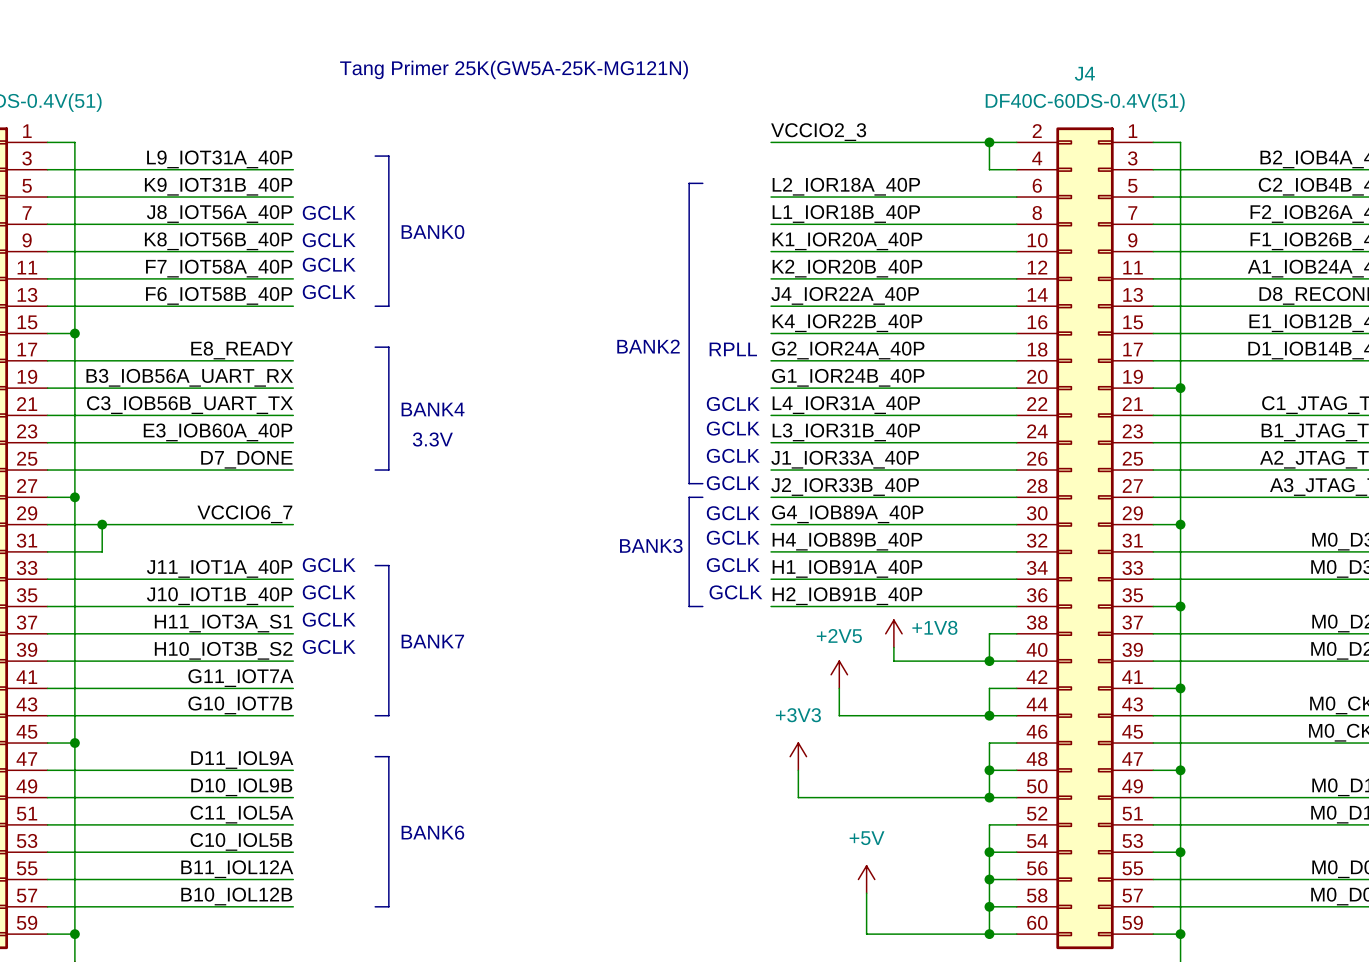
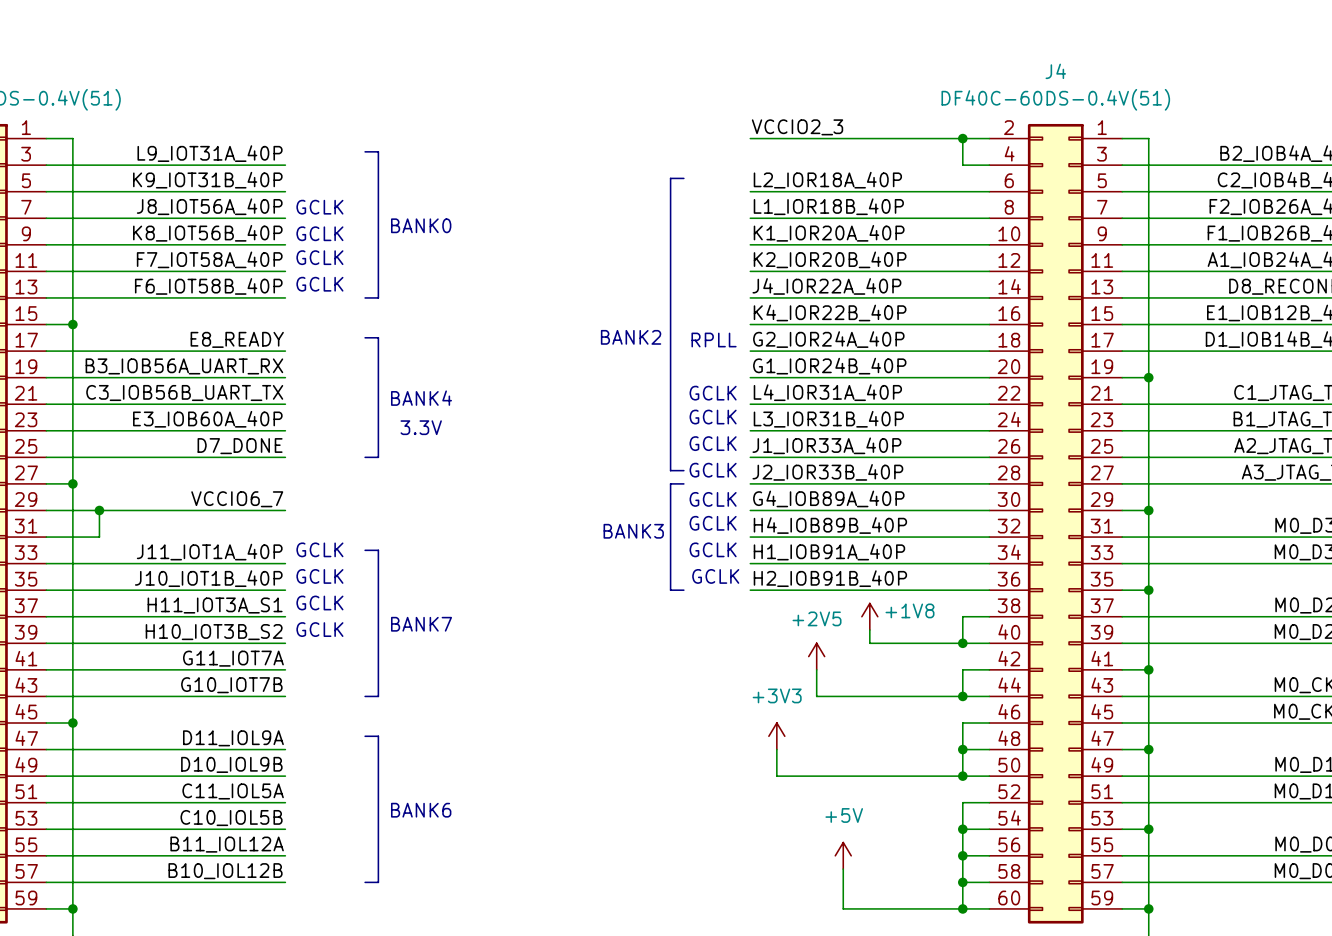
text: Tang Primer 25K(GW5A-25K-MG121N) (514, 69) -> none

